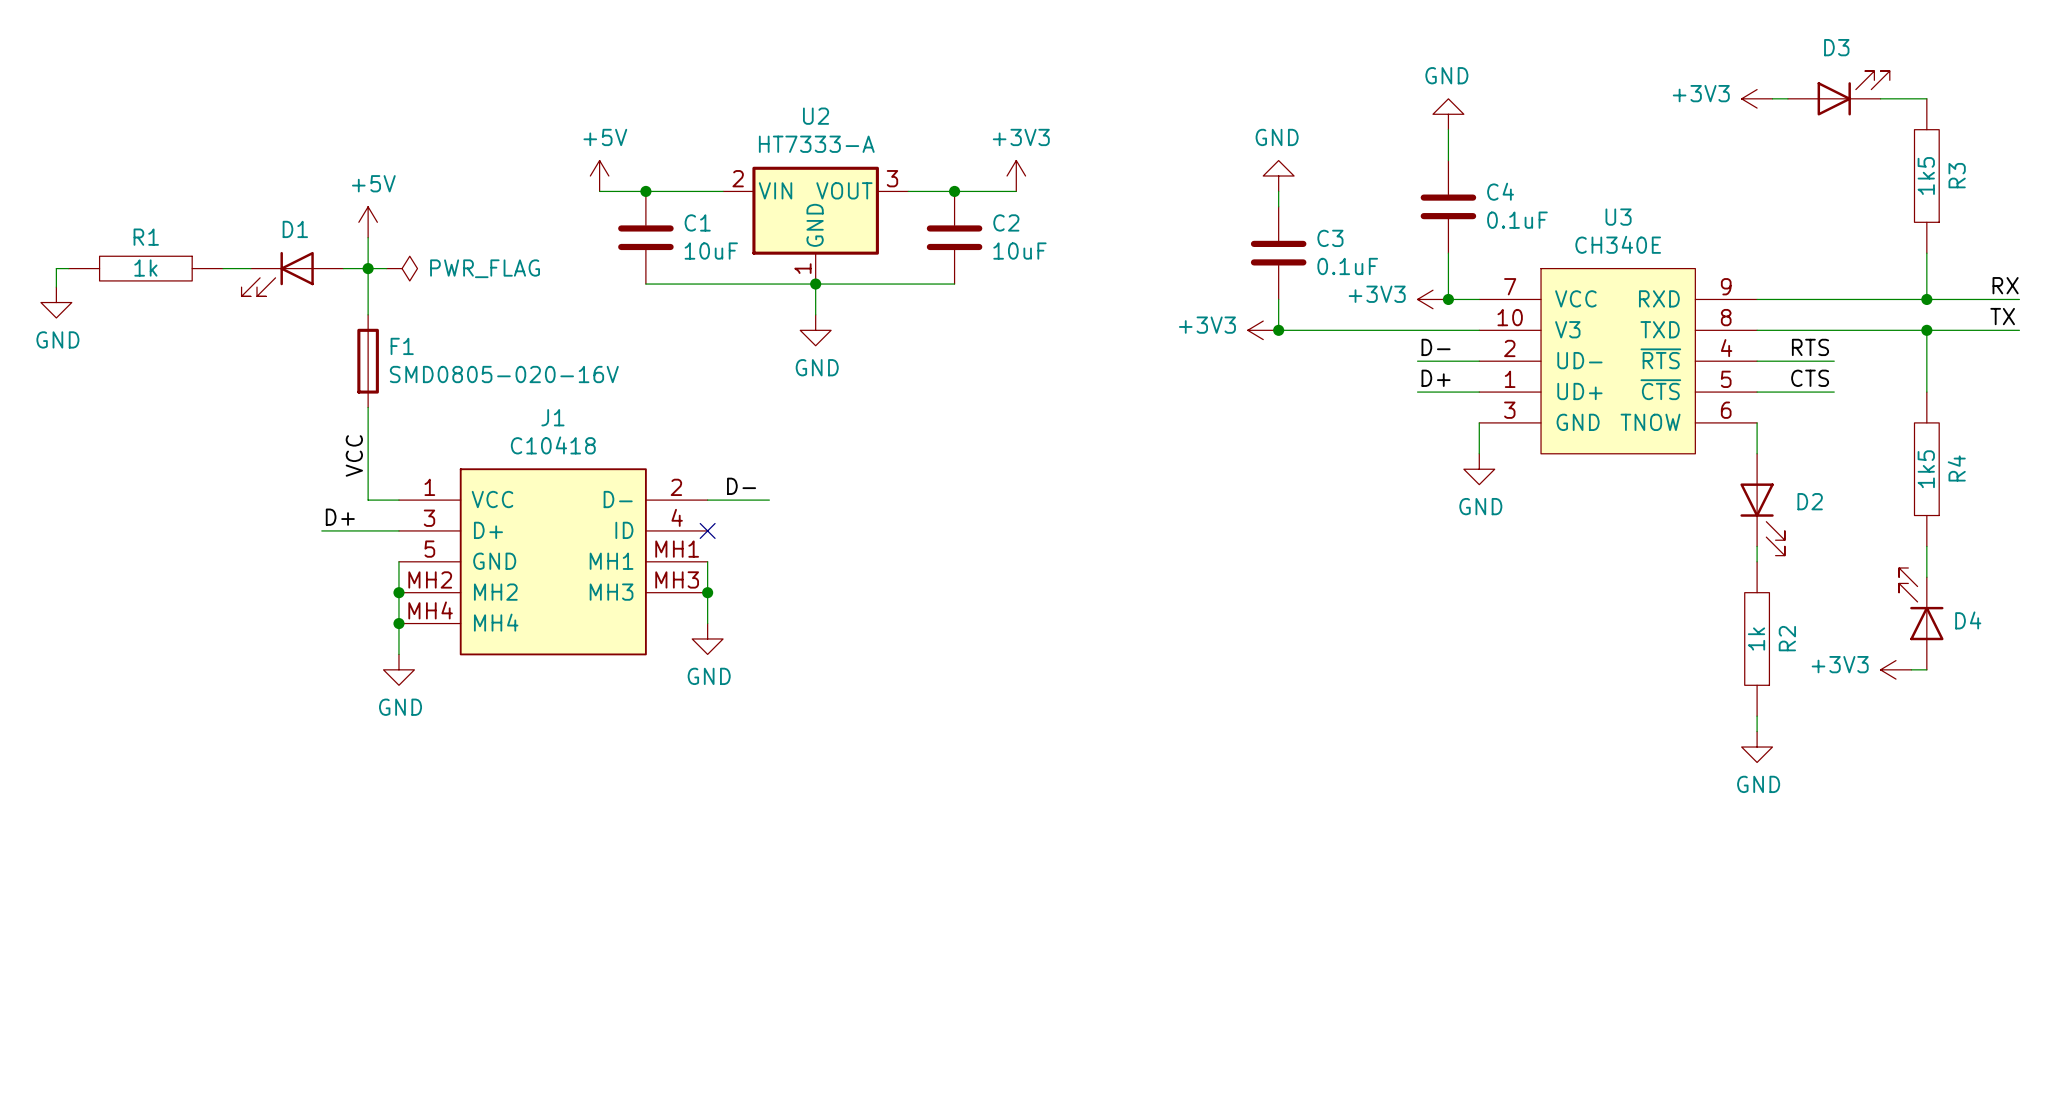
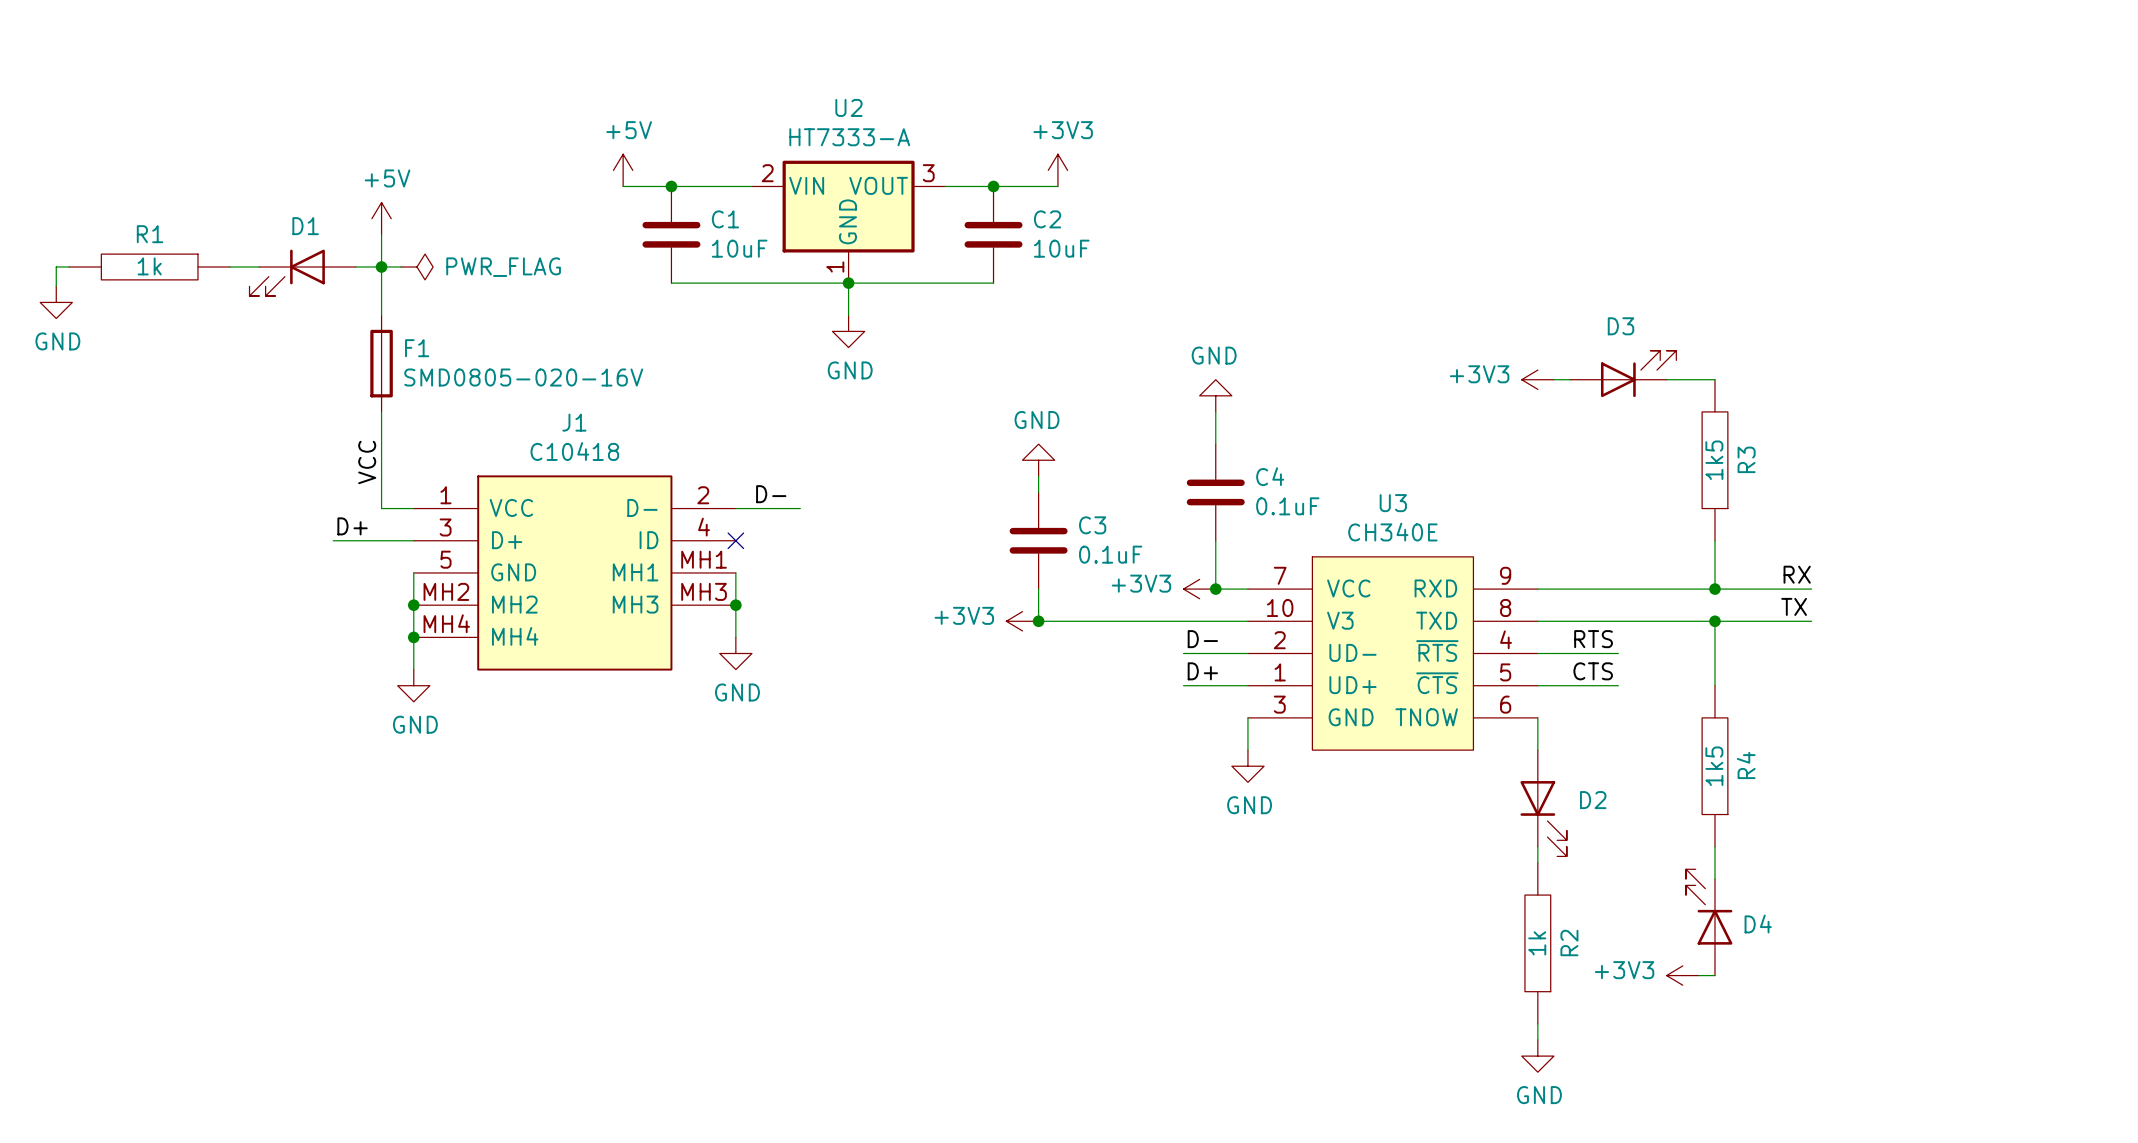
D3 position: (1838, 93) -> (1623, 373)
power symbol: +3V3 (1757, 98) -> none
wire: (1772, 98) (1787, 98) -> none
wire: (1880, 98) (1926, 98) -> none
power symbol: GND (1448, 114) -> none
wire: (1448, 129) (1448, 160) -> none
power symbol: GND (1278, 176) -> none
R3 position: (1926, 176) -> (1714, 460)
wire: (1278, 191) (1278, 206) -> none
C4 position: (1448, 206) -> (1215, 492)
C3 position: (1278, 253) -> (1038, 540)
wire: (1448, 253) (1448, 299) (1479, 299) -> none
wire: (1926, 253) (1926, 299) -> none
label: RX (2005, 285) -> none
wire: (1278, 299) (1278, 330) (1479, 330) -> none
power symbol position: +3V3 (1432, 299) -> +3V3 (1537, 379)
junction: (1448, 299) -> none
wire: (1757, 299) (2019, 299) -> none
junction: (1926, 299) -> none
label: TX (2002, 316) -> none
power symbol: +3V3 (1263, 330) -> none
junction: (1278, 330) -> none
wire: (1757, 330) (2019, 330) -> none
wire: (1926, 330) (1926, 392) -> none
junction: (1926, 330) -> none
label: D- (1436, 347) -> none
label: RTS (1810, 347) -> none
wire: (1417, 361) (1479, 361) -> none
U3 position: (1618, 361) -> (1392, 653)
wire: (1757, 361) (1834, 361) -> none
wire: none -> (1553, 379) (1570, 379)
label: D+ (1436, 378) -> none
label: CTS (1810, 378) -> none
power symbol: none -> GND (1215, 395)
wire: (1417, 392) (1479, 392) -> none
wire: (1757, 392) (1834, 392) -> none
wire: none -> (1215, 411) (1215, 444)
wire: (1479, 422) (1479, 453) -> (1537, 717) (1537, 750)
wire: (1757, 422) (1757, 453) -> none
power symbol: none -> GND (1038, 460)
wire: none -> (1038, 476) (1038, 492)
power symbol: GND (1479, 469) -> none
R4 position: (1926, 469) -> (1714, 766)
D2 position: (1762, 504) -> (1543, 803)
wire: none -> (1215, 540) (1215, 589) (1247, 589)
wire: none -> (1714, 540) (1714, 589)
wire: (1757, 546) (1757, 561) -> none
wire: (1926, 546) (1926, 577) -> none
label: none -> RX (1797, 574)
wire: none -> (1038, 589) (1038, 621) (1247, 621)
power symbol: none -> +3V3 (1199, 589)
junction: none -> (1215, 589)
wire: none -> (1537, 589) (1811, 589)
junction: none -> (1714, 589)
label: none -> TX (1794, 606)
power symbol: none -> +3V3 (1022, 621)
junction: none -> (1038, 621)
wire: none -> (1537, 621) (1811, 621)
wire: none -> (1714, 621) (1714, 685)
junction: none -> (1714, 621)
D4 position: (1921, 618) -> (1709, 922)
label: none -> D- (1202, 639)
label: none -> RTS (1593, 639)
wire: none -> (1183, 653) (1247, 653)
wire: none -> (1537, 653) (1618, 653)
R2 position: (1757, 638) -> (1537, 943)
label: none -> D+ (1202, 671)
label: none -> CTS (1593, 671)
wire: none -> (1183, 685) (1247, 685)
wire: none -> (1537, 685) (1618, 685)
power symbol: +3V3 (1895, 669) -> none
wire: (1911, 669) (1926, 669) -> none
wire: none -> (1247, 717) (1247, 750)
wire: (1757, 716) (1757, 731) -> (1537, 846) (1537, 862)
power symbol: none -> GND (1247, 766)
power symbol: GND (1757, 747) -> none
wire: none -> (1714, 846) (1714, 878)
power symbol: none -> +3V3 (1682, 975)
wire: none -> (1698, 975) (1714, 975)
wire: none -> (1537, 1023) (1537, 1039)
power symbol: none -> GND (1537, 1056)

